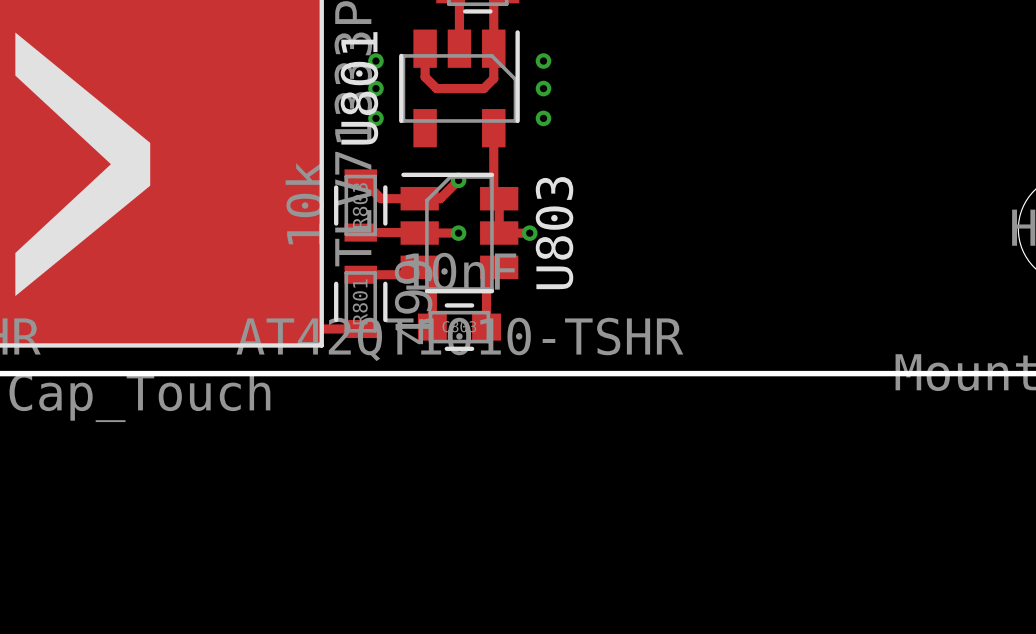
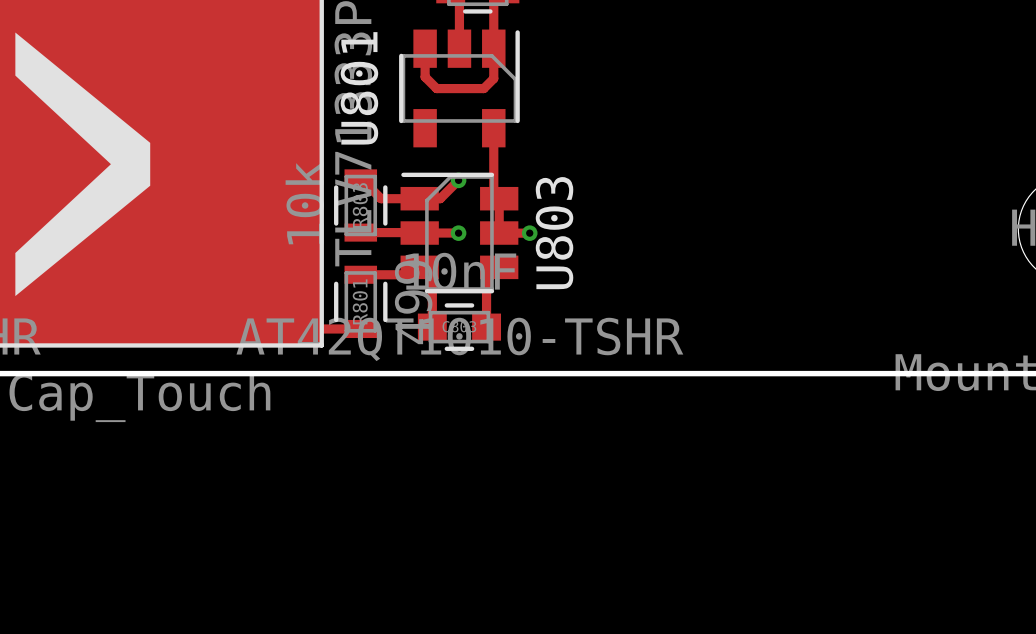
via: (375, 61) -> none
via: (543, 61) -> none
via: (375, 88) -> none
via: (543, 88) -> none
via: (375, 118) -> none
via: (543, 118) -> none

